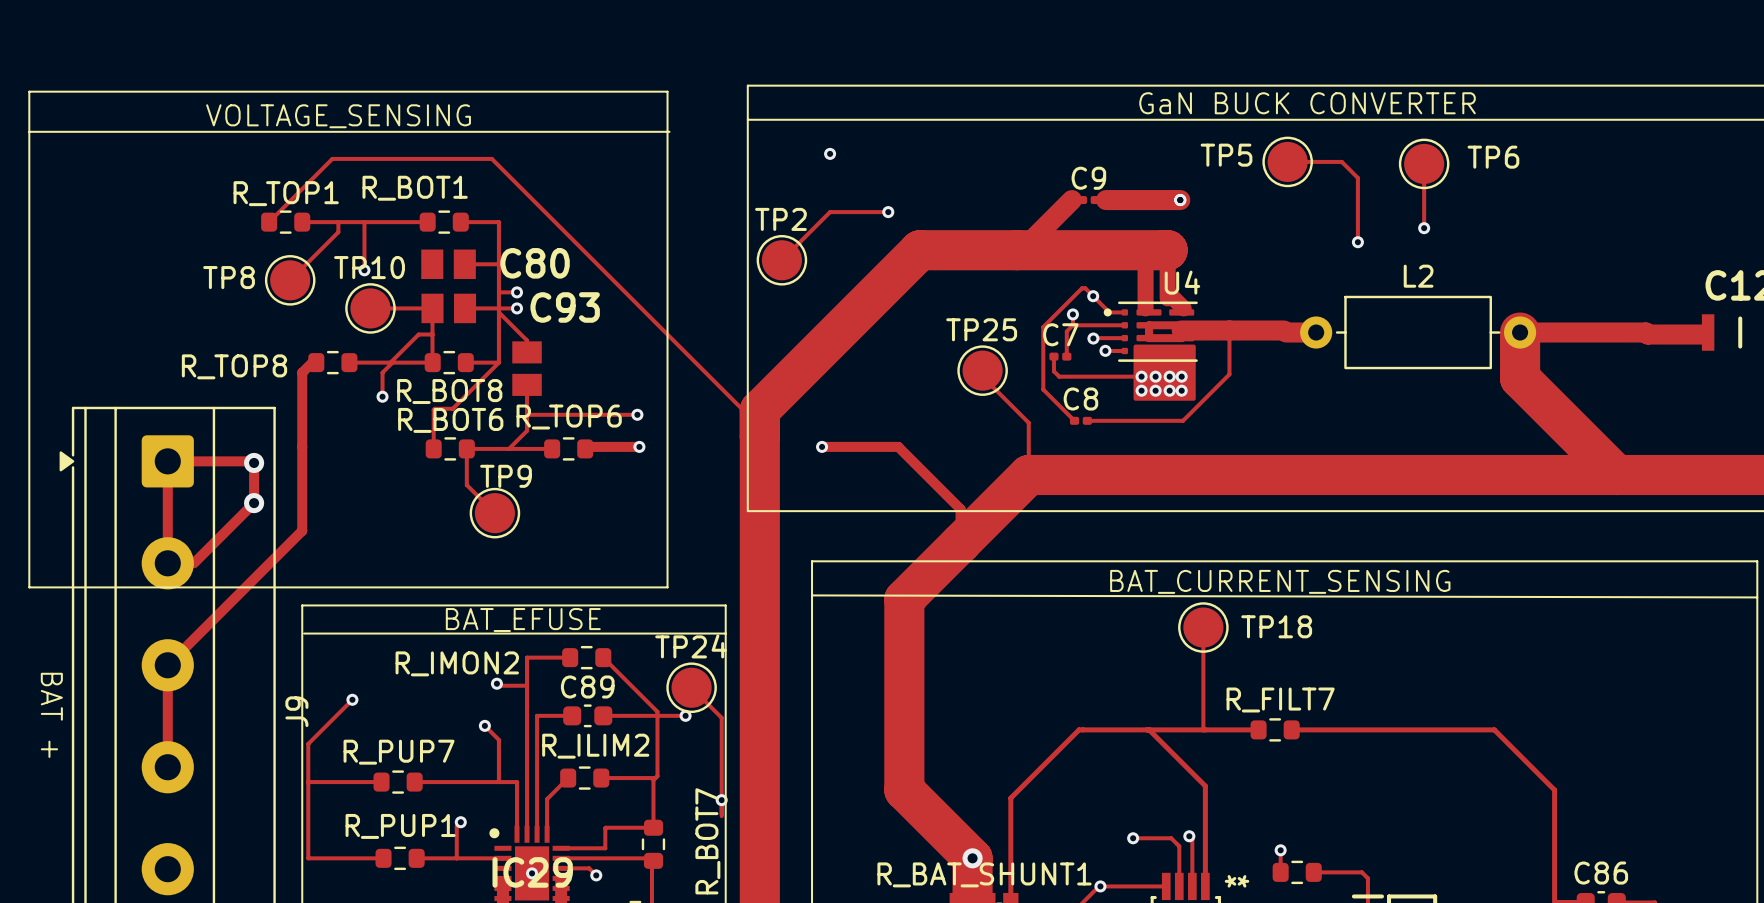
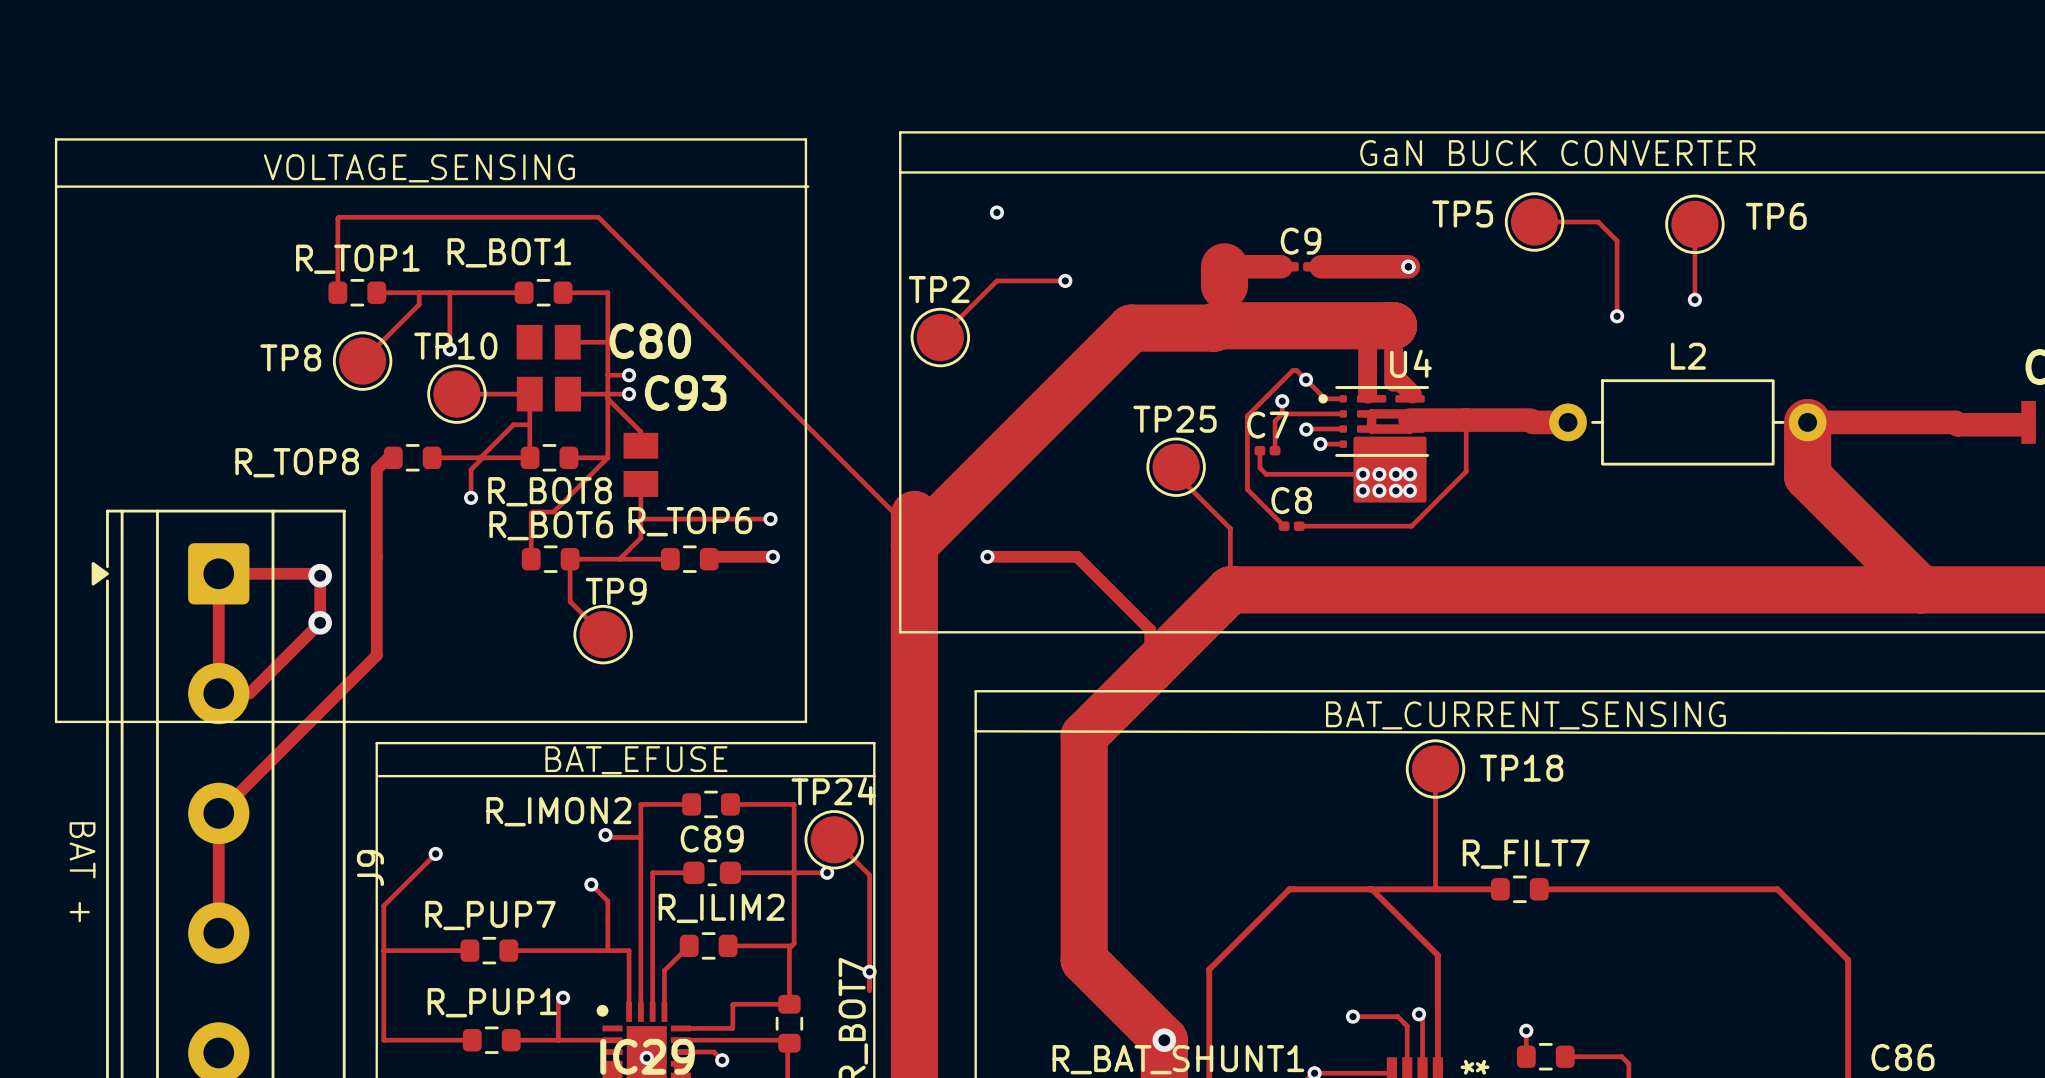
track: (491, 158) (332, 158) (269, 222) -> (599, 218) (339, 217) (337, 292)
track: none -> (1224, 266) (1224, 285)
track: (1071, 200) (1021, 250) (919, 250) (759, 410) -> (1281, 266) (1224, 266)
track: none -> (1216, 325) (1214, 328) (1131, 328) (914, 545)
track: (603, 657) (657, 711) -> (730, 804) (794, 804) (794, 868)

